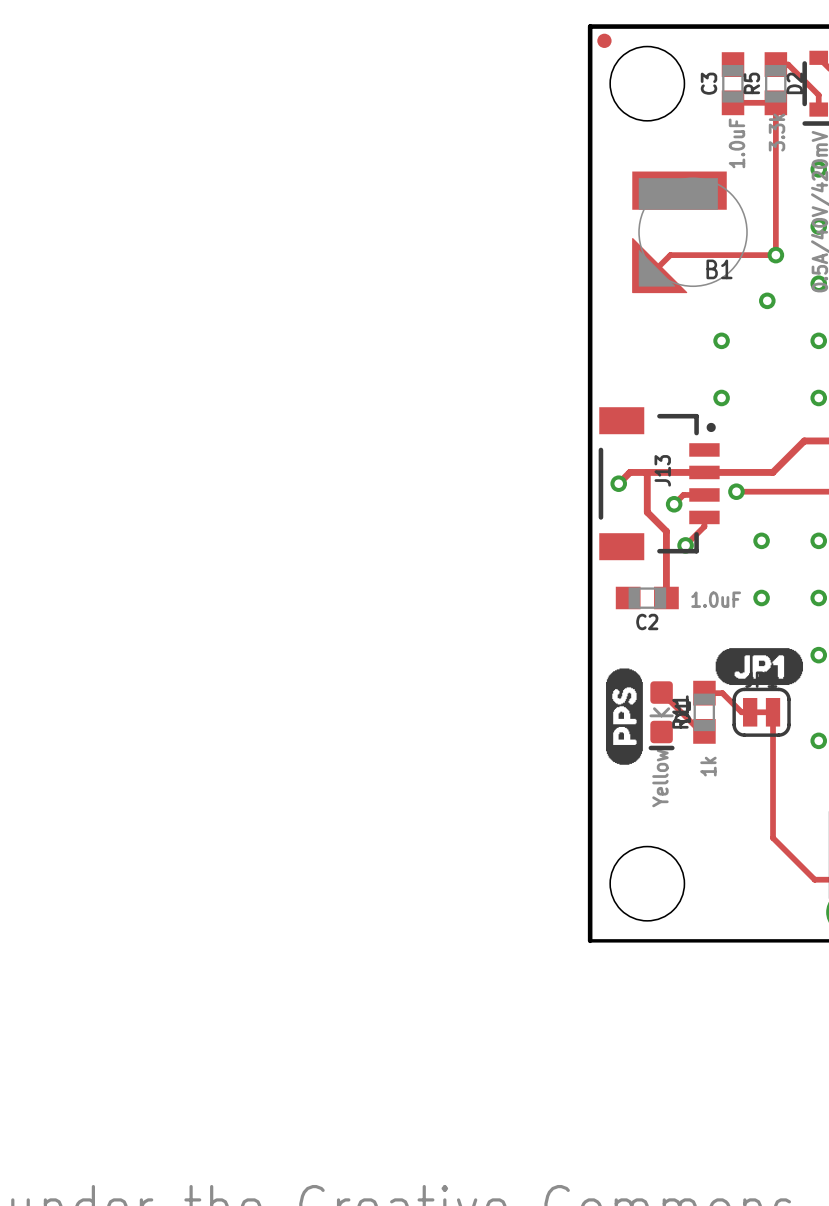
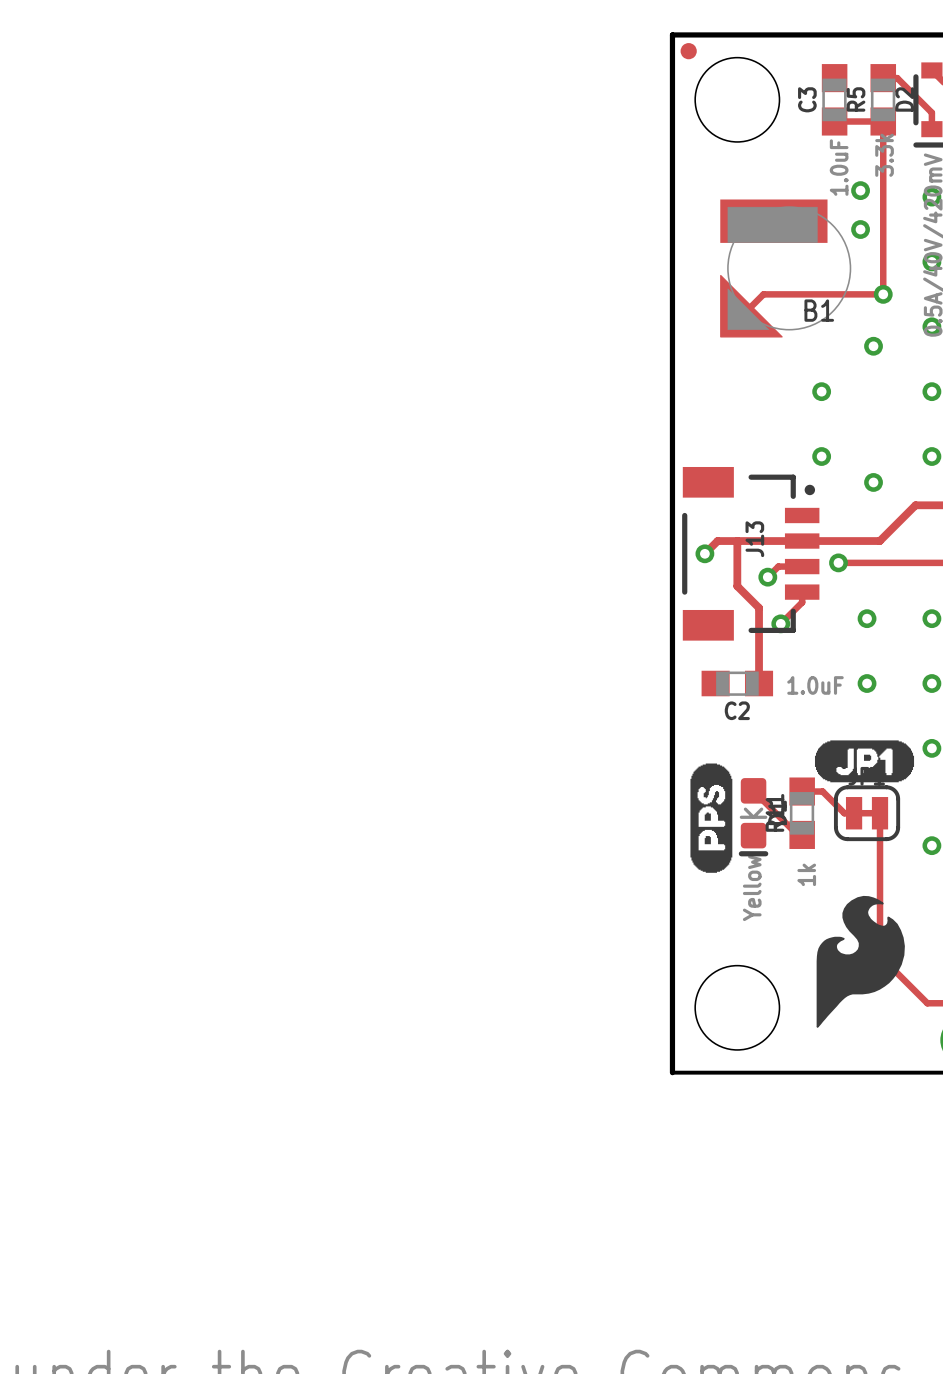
via: none -> (860, 190)
via: none -> (860, 229)
via: none -> (873, 482)
drawing: none -> [816, 895, 905, 1028]

